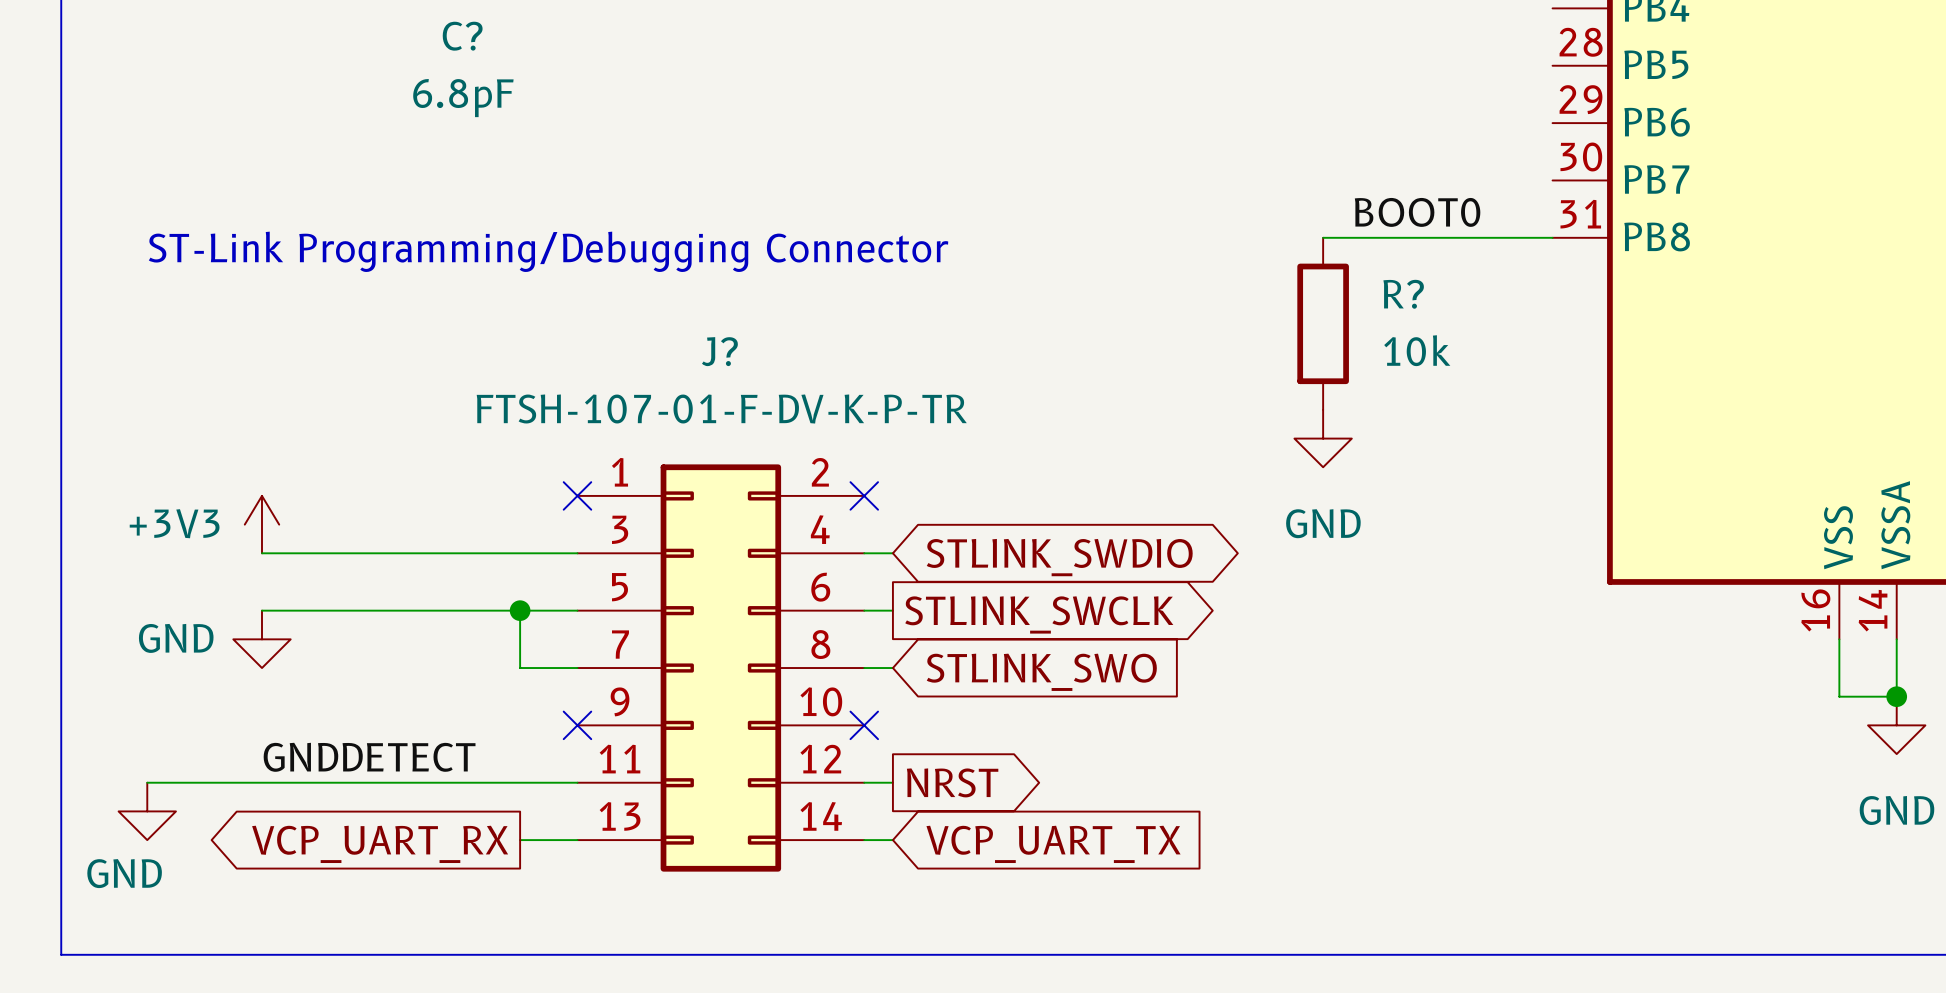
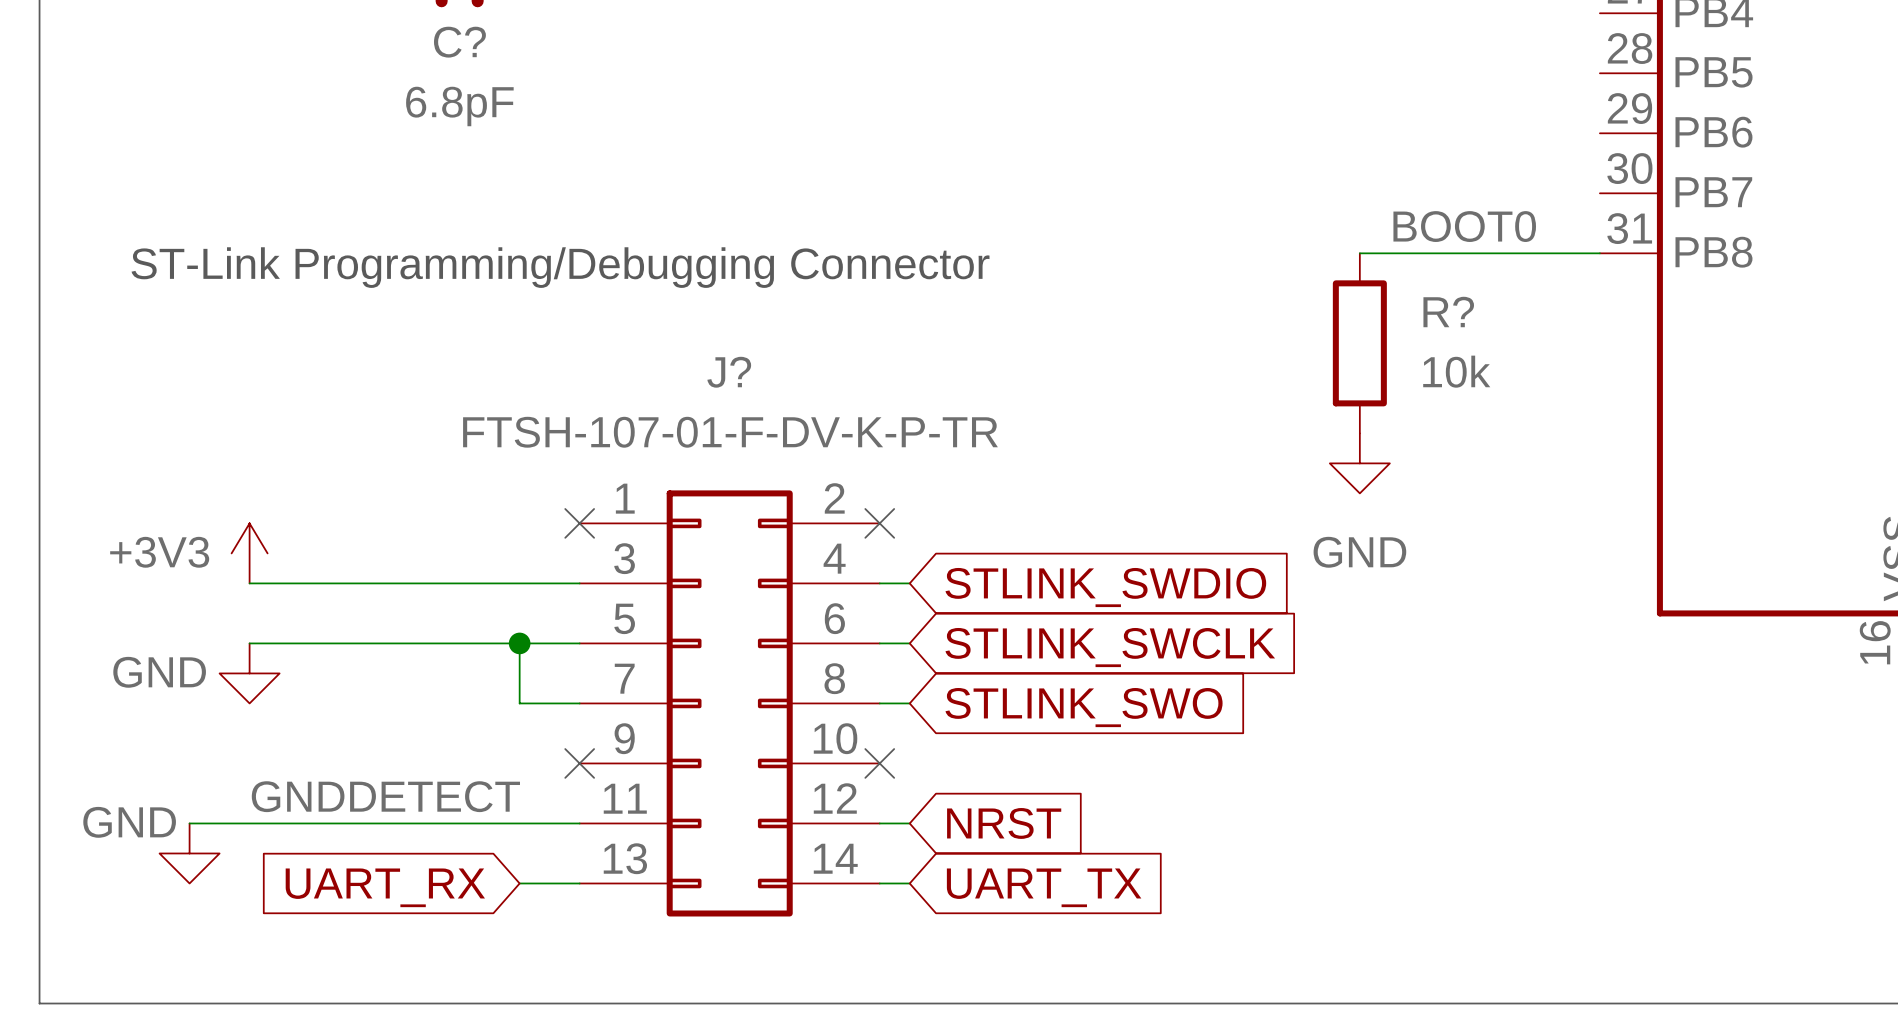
global label shape: bidirectional (1059, 557) -> input (1105, 587)
global label shape: output (1039, 614) -> input (1110, 647)
wire: (147, 782) (204, 782) -> none
global label shape: output (952, 782) -> input (1004, 823)
power symbol position: GND (147, 811) -> GND (189, 853)
global label shape: output (380, 844) -> input (385, 887)
global label: VCP_UART_RX (380, 844) -> UART_RX (385, 887)
global label: VCP_UART_TX (1053, 844) -> UART_TX (1044, 887)
power symbol text position: GND (124, 873) -> GND (129, 822)

